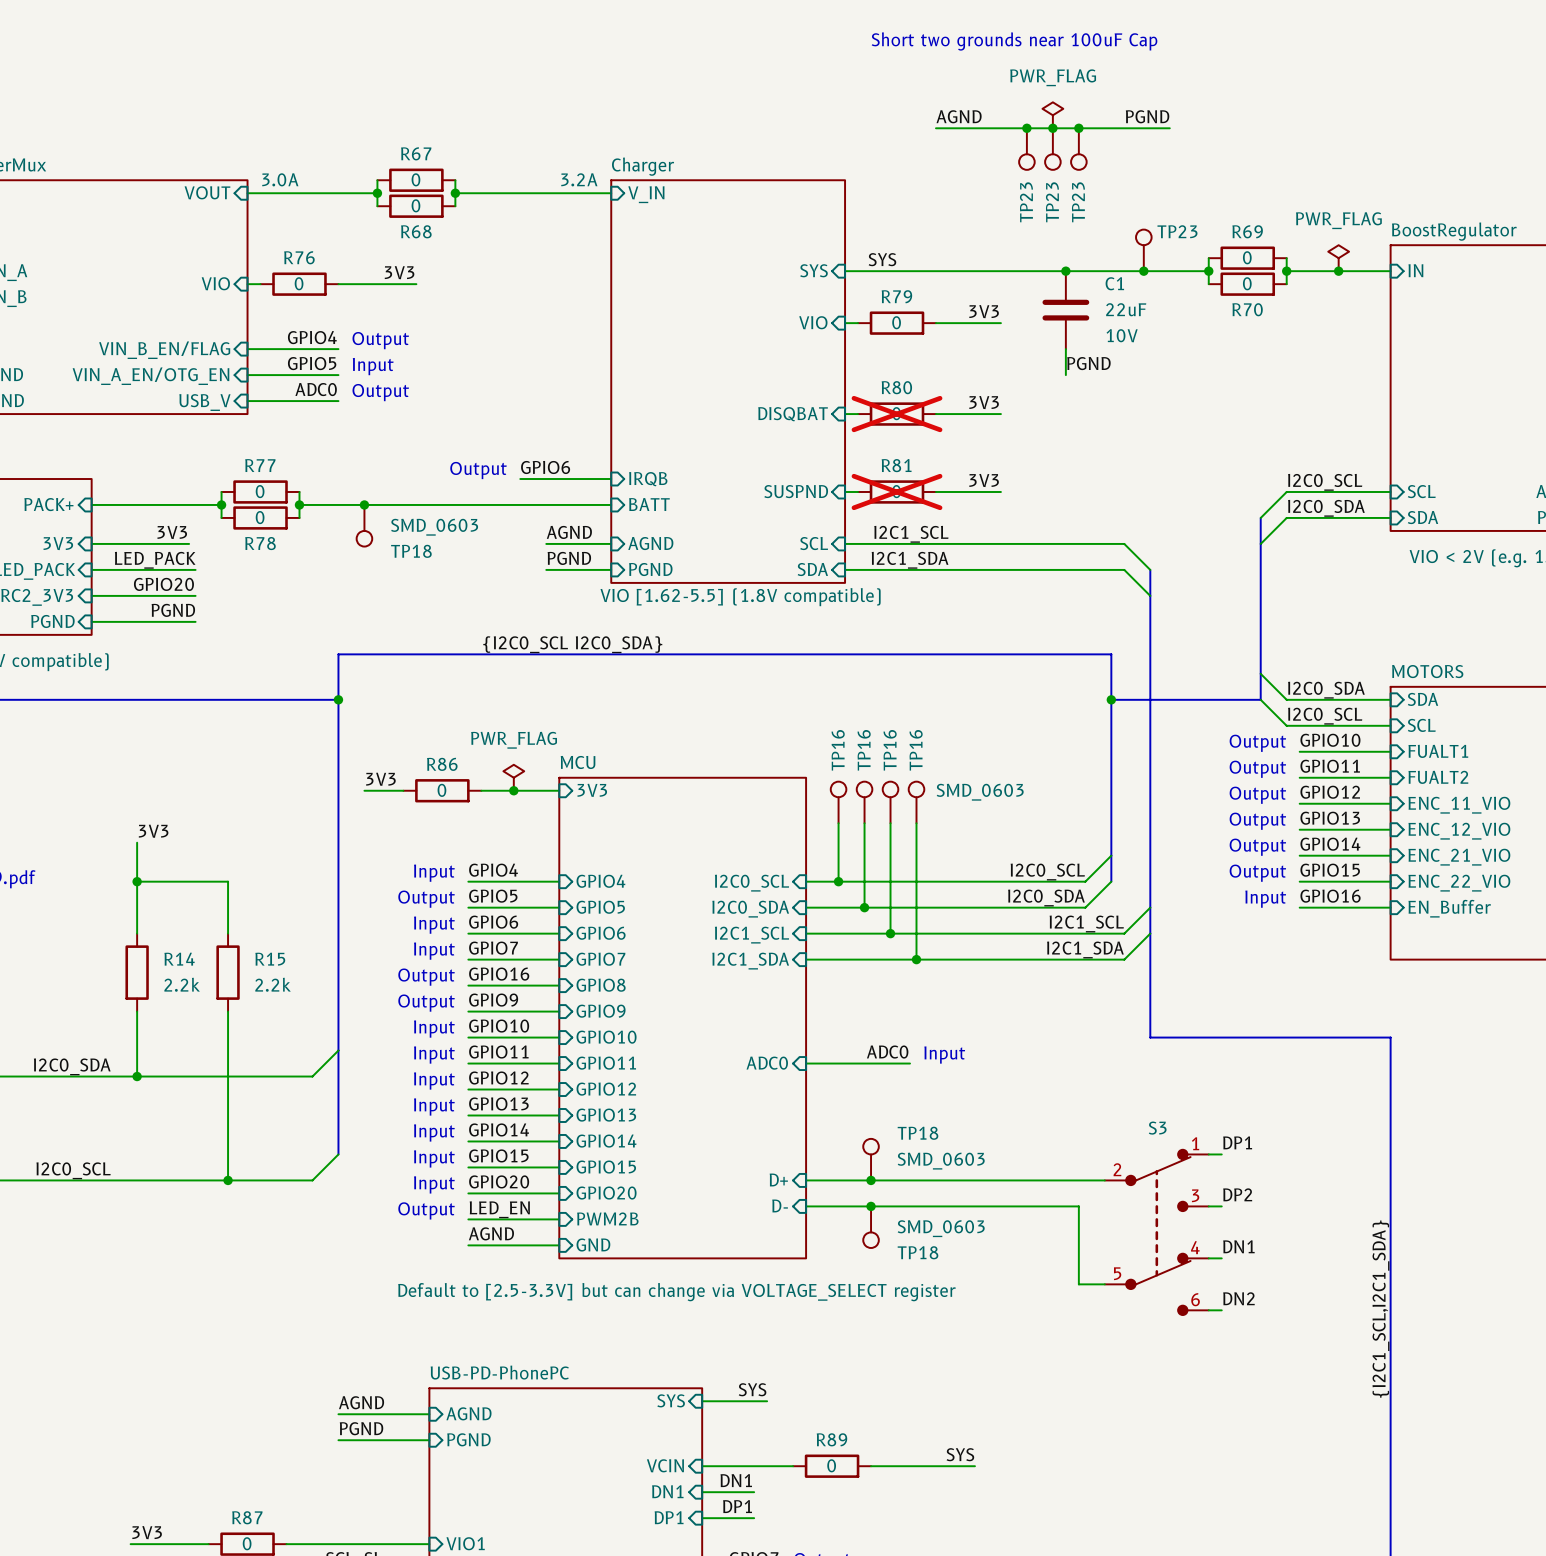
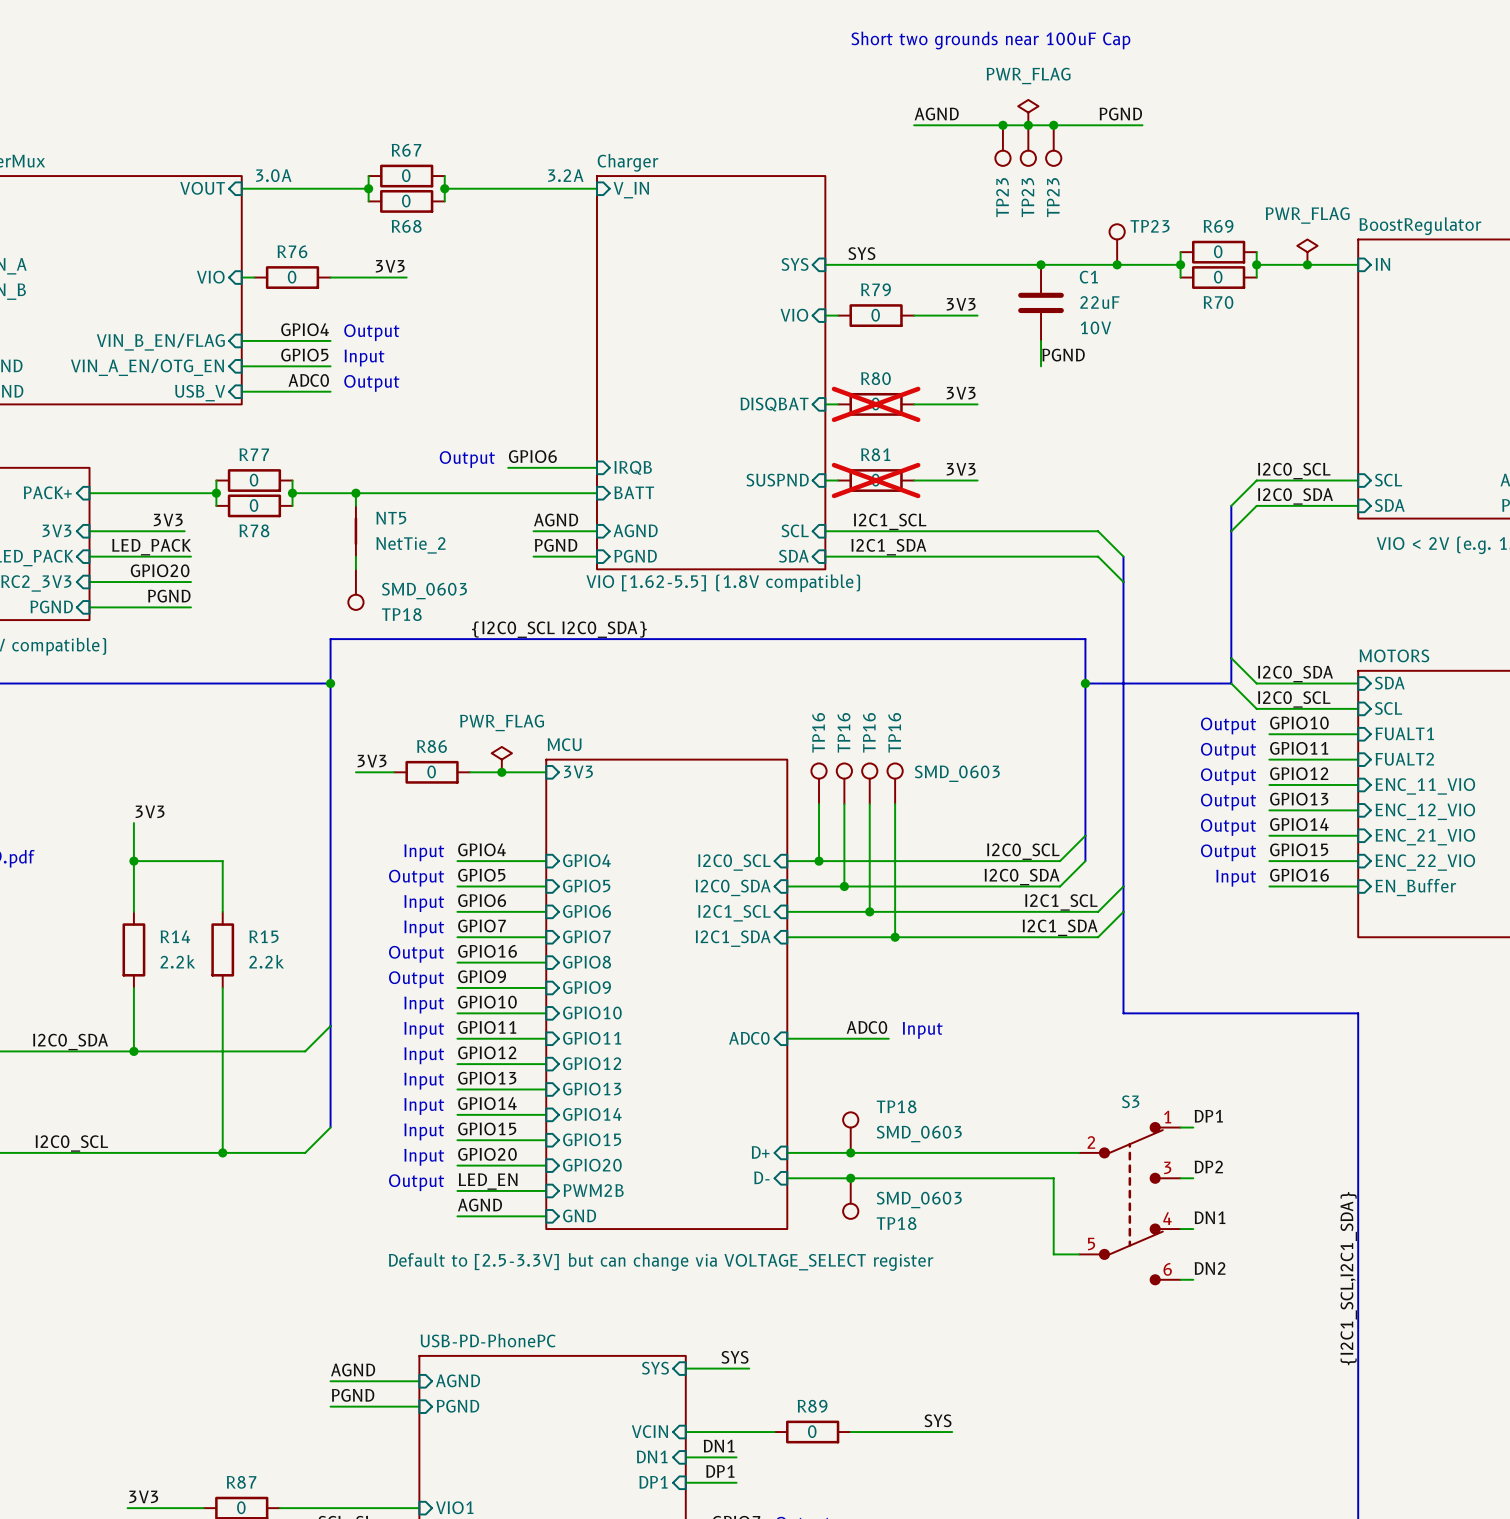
TP18 position: (364, 525) -> (355, 589)
NT5: none -> NetTie_2 (355, 531)
wire: none -> (355, 556) (355, 569)

